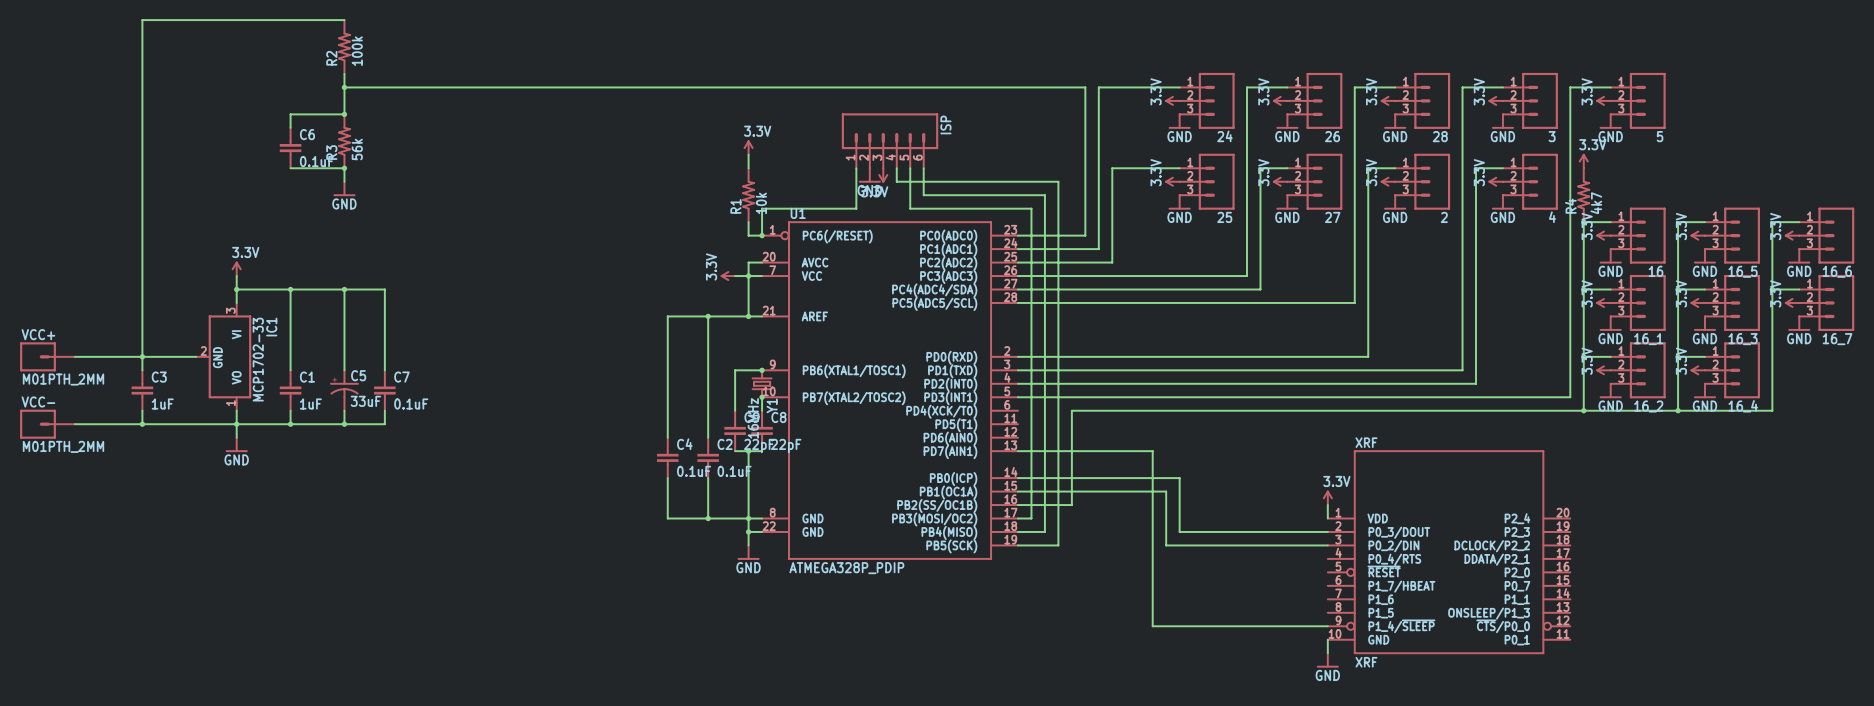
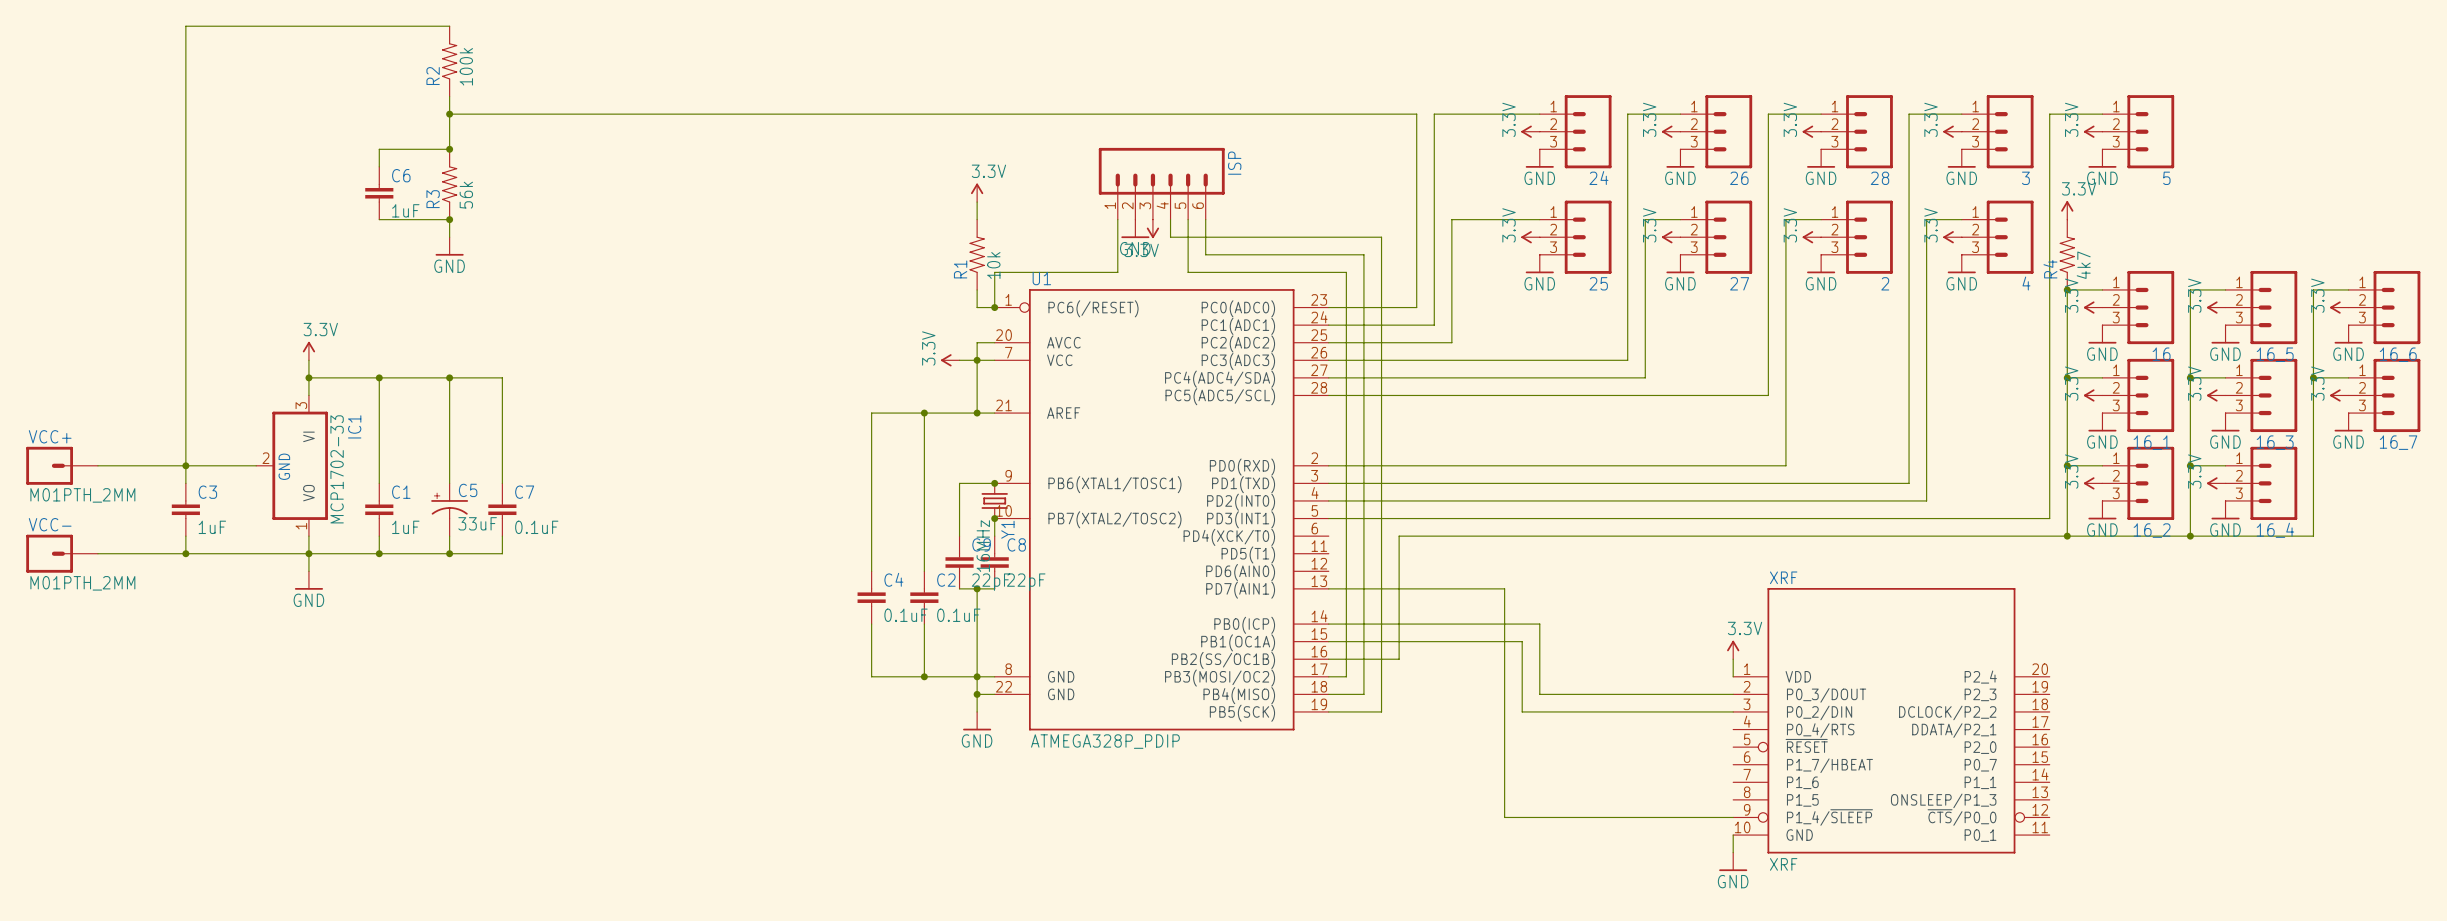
C6 value: 0.1uF (316, 161) -> 1uF (405, 210)

